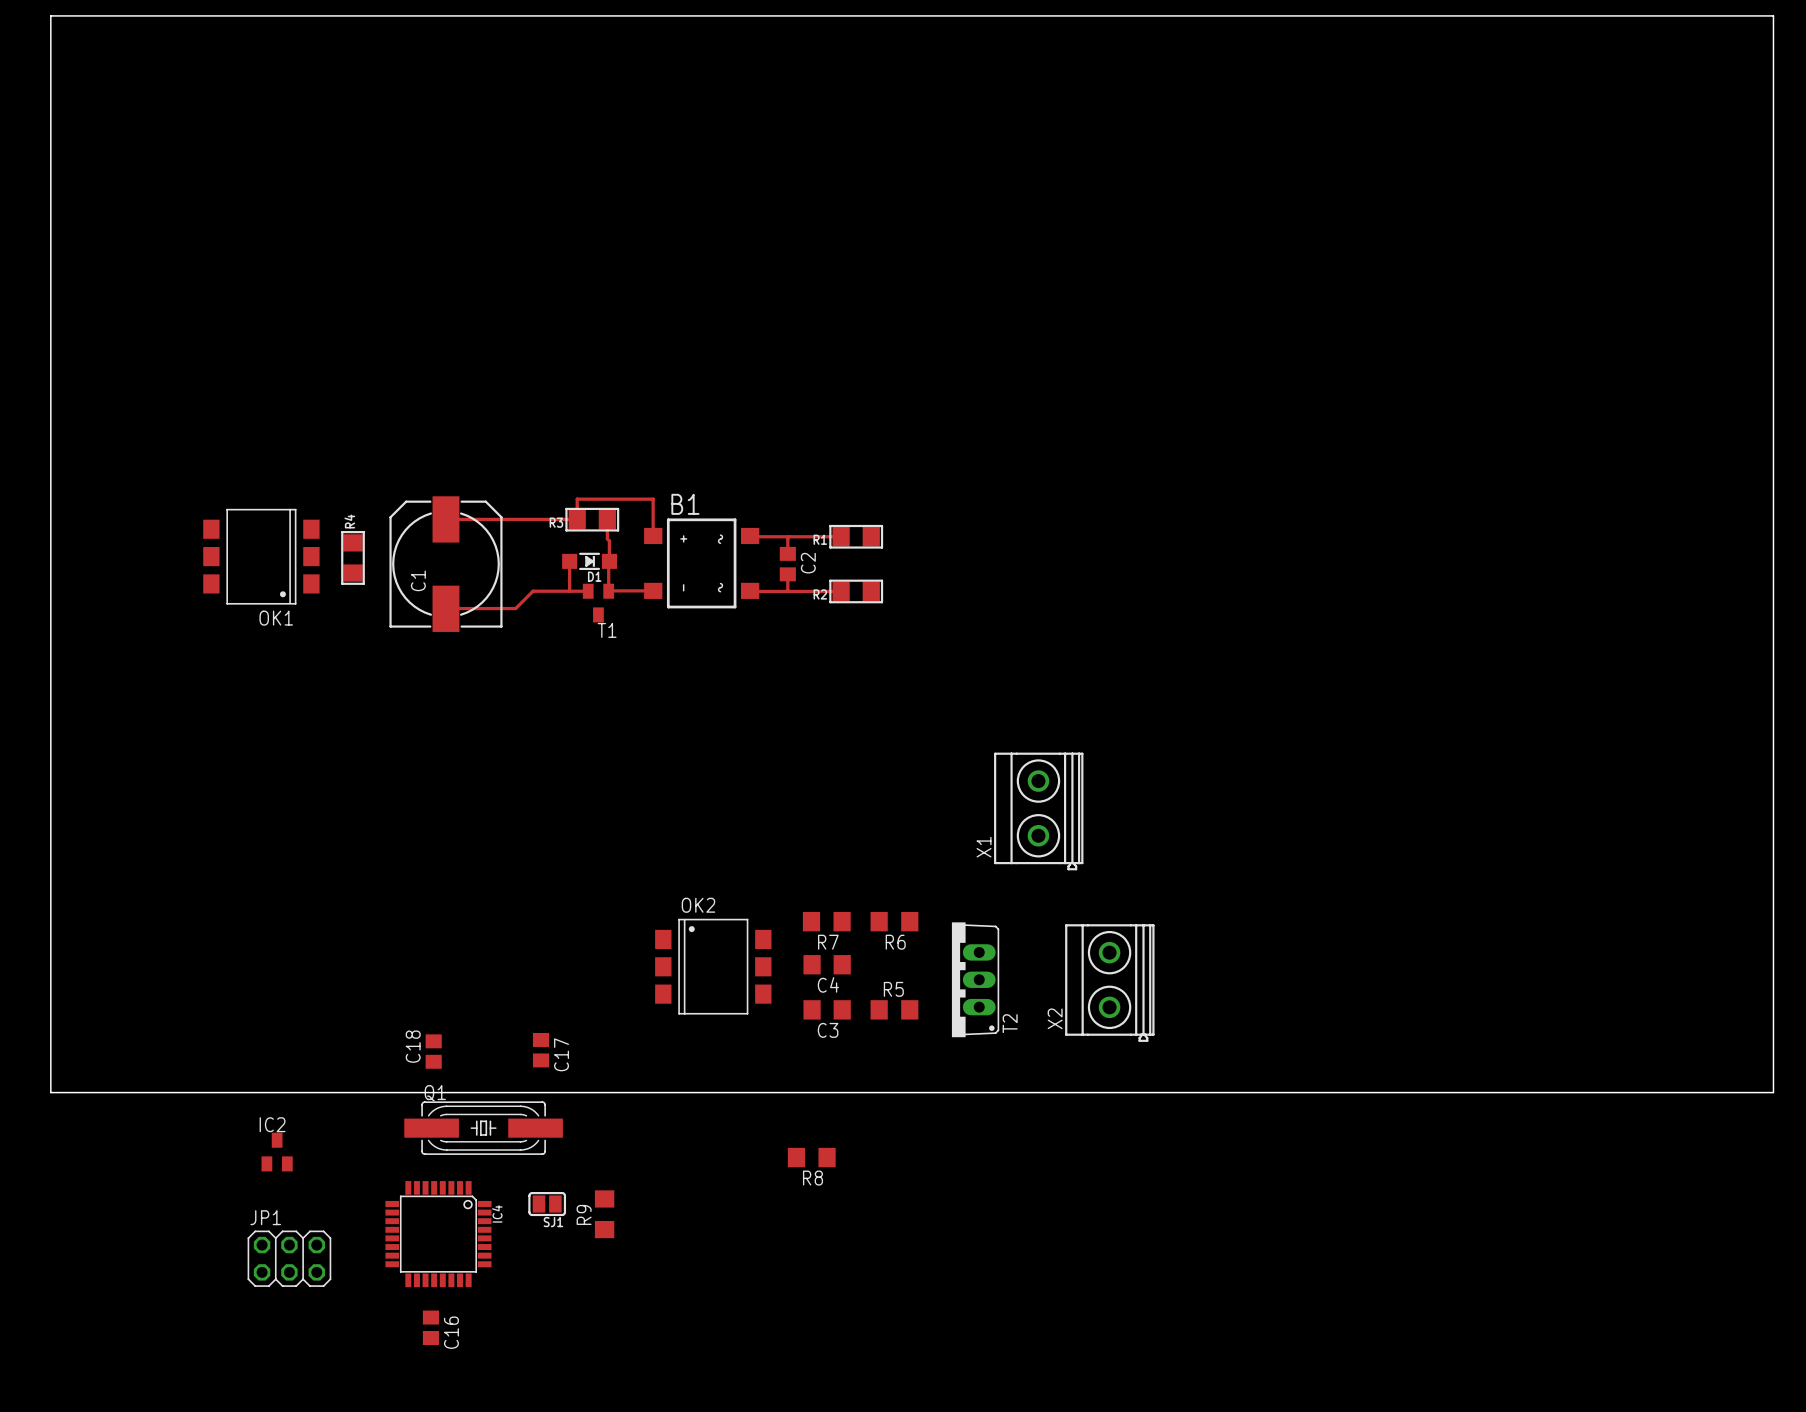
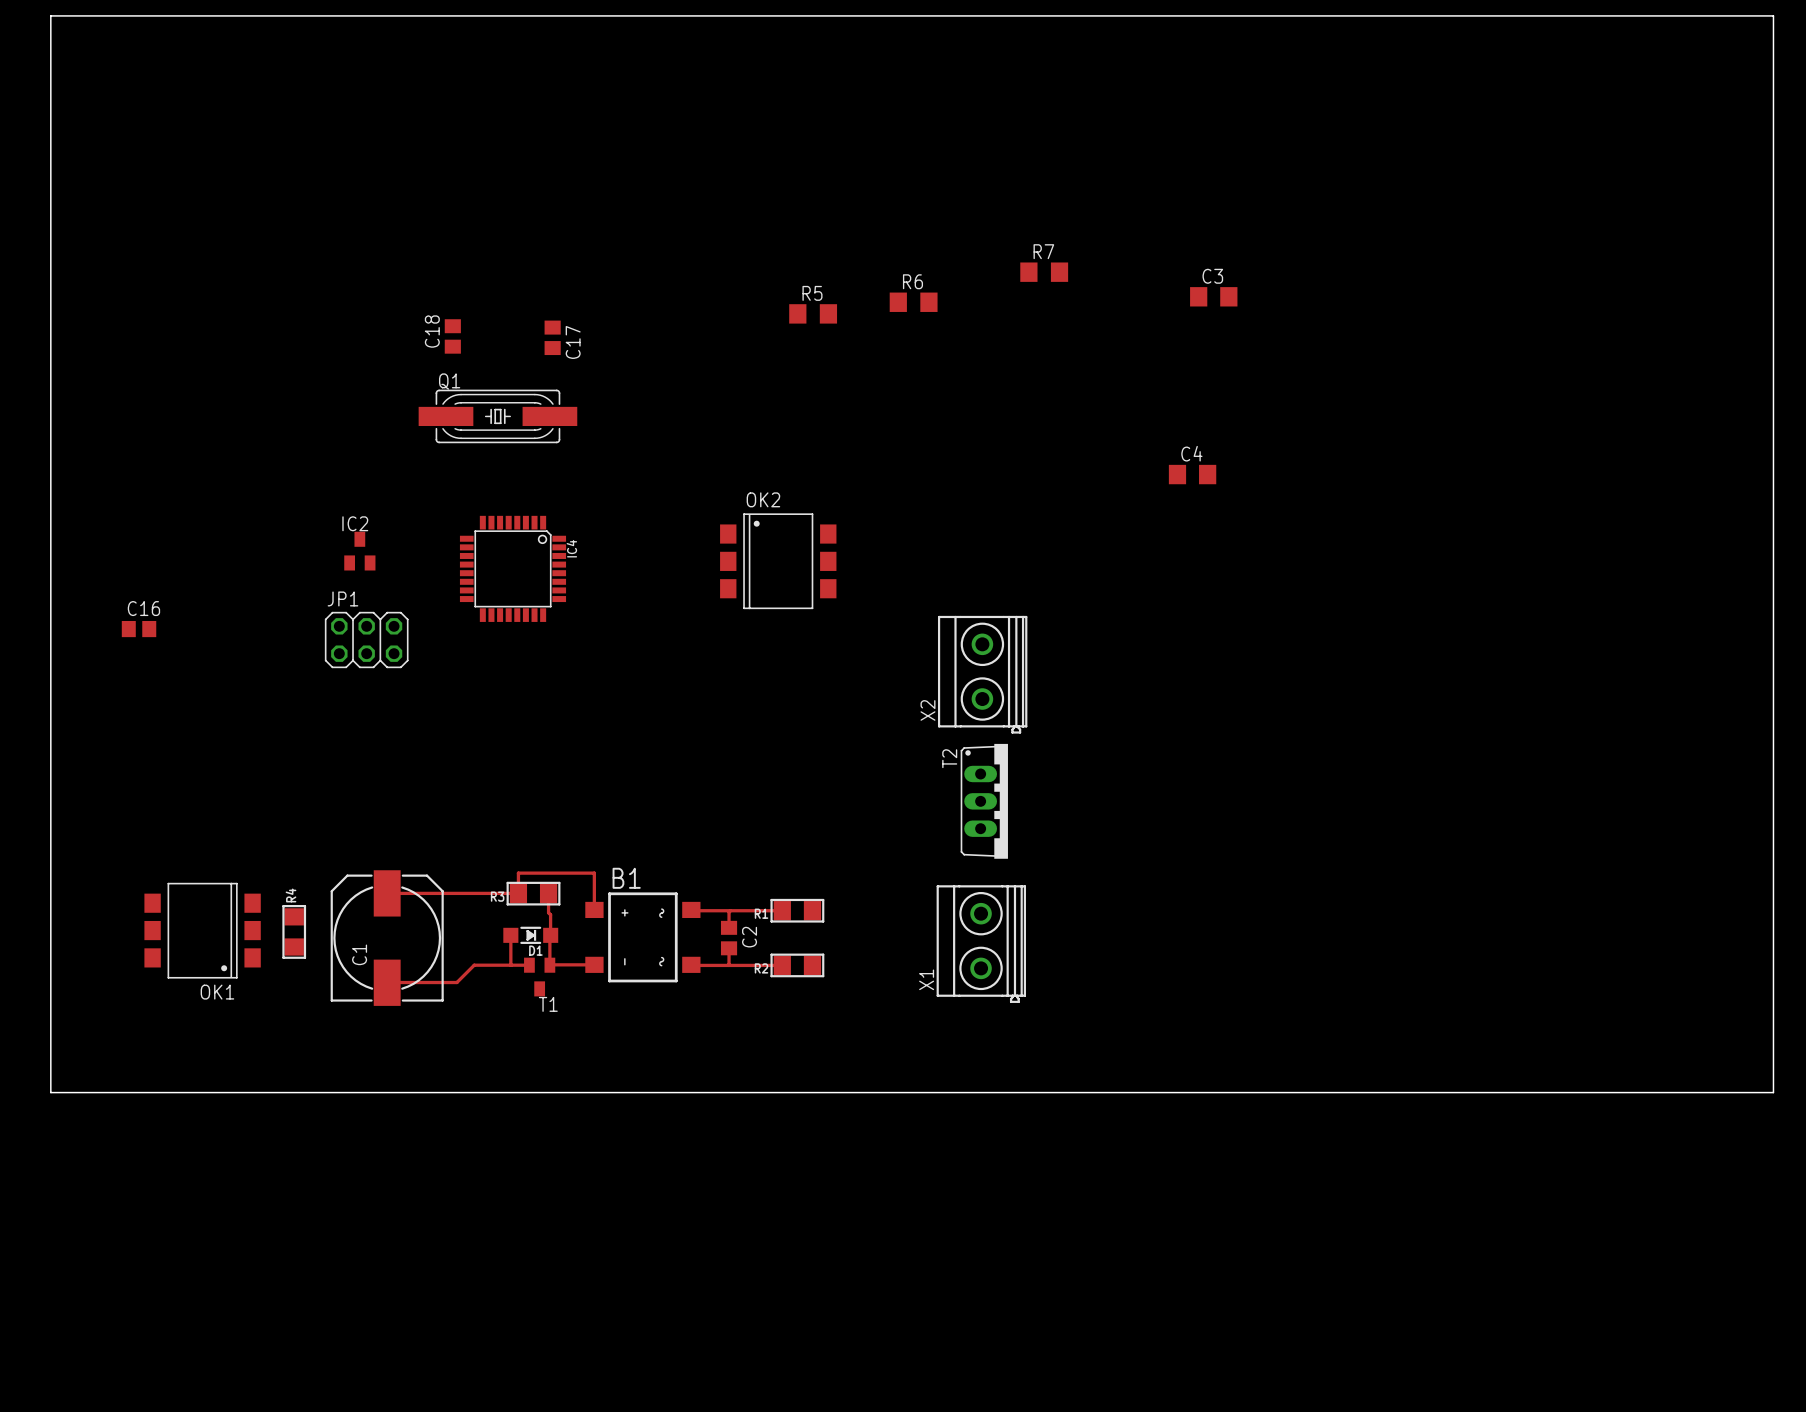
track: (445, 519) (577, 519) -> none
track: (577, 519) (577, 499) (653, 499) (653, 535) -> none
R3 position: (592, 519) -> (533, 893)
track: (607, 519) (609, 561) -> none
track: (750, 535) (841, 536) -> none
track: (789, 536) (787, 553) -> none
R1 position: (856, 536) -> (797, 910)
OK1 position: (261, 556) -> (202, 930)
R4 position: (353, 557) -> (294, 931)
track: (569, 561) (569, 591) -> none
D1 position: (589, 561) -> (530, 935)
track: (609, 561) (608, 591) (653, 590) -> none
B1 position: (701, 563) -> (642, 937)
C1 position: (445, 564) -> (387, 938)
C2 position: (787, 564) -> (729, 938)
track: (787, 574) (787, 591) -> none
track: (750, 590) (841, 591) -> none
track: (588, 591) (533, 591) (515, 608) (445, 608) -> none
R2 position: (856, 591) -> (797, 965)
T1 position: (598, 603) -> (539, 977)
X1 position: (1038, 811) -> (981, 944)
track: none -> (387, 893) (518, 893)
track: none -> (518, 893) (518, 873) (594, 873) (594, 909)
track: none -> (548, 893) (550, 935)
track: none -> (691, 909) (782, 910)
track: none -> (730, 910) (728, 927)
R7 position: (826, 921) -> (1044, 272)
R6 position: (894, 921) -> (913, 302)
track: none -> (510, 935) (510, 965)
track: none -> (550, 935) (549, 965) (594, 964)
R7 name position: R7 (828, 942) -> R7 (1043, 251)
R6 name position: R6 (895, 942) -> R6 (912, 281)
track: none -> (729, 948) (728, 965)
track: none -> (691, 964) (782, 965)
C4 position: (827, 964) -> (1192, 474)
track: none -> (529, 965) (474, 965) (456, 982) (387, 982)
OK2 position: (713, 966) -> (778, 561)
T2 rotation: 0° (975, 979) -> 180° (984, 801)
T2 position: (975, 979) -> (984, 801)
X2 position: (1109, 983) -> (982, 674)
C4 name position: C4 (828, 984) -> C4 (1191, 453)
C3 position: (827, 1009) -> (1213, 296)
R5 position: (894, 1009) -> (813, 313)
C3 name position: C3 (828, 1030) -> C3 (1212, 276)
C17 position: (541, 1050) -> (552, 337)
C18 position: (433, 1051) -> (452, 336)
Q1 position: (483, 1128) -> (497, 416)
IC2 position: (277, 1152) -> (359, 551)
R8: (811, 1157) -> none
SJ1: (547, 1204) -> none
R9: (604, 1214) -> none
IC4 position: (438, 1234) -> (512, 568)
JP1 position: (289, 1258) -> (366, 639)
C16 rotation: 0° (430, 1327) -> 90° clockwise (139, 629)
C16 position: (430, 1327) -> (139, 629)
C16 name position: C16 (451, 1332) -> C16 (143, 608)

